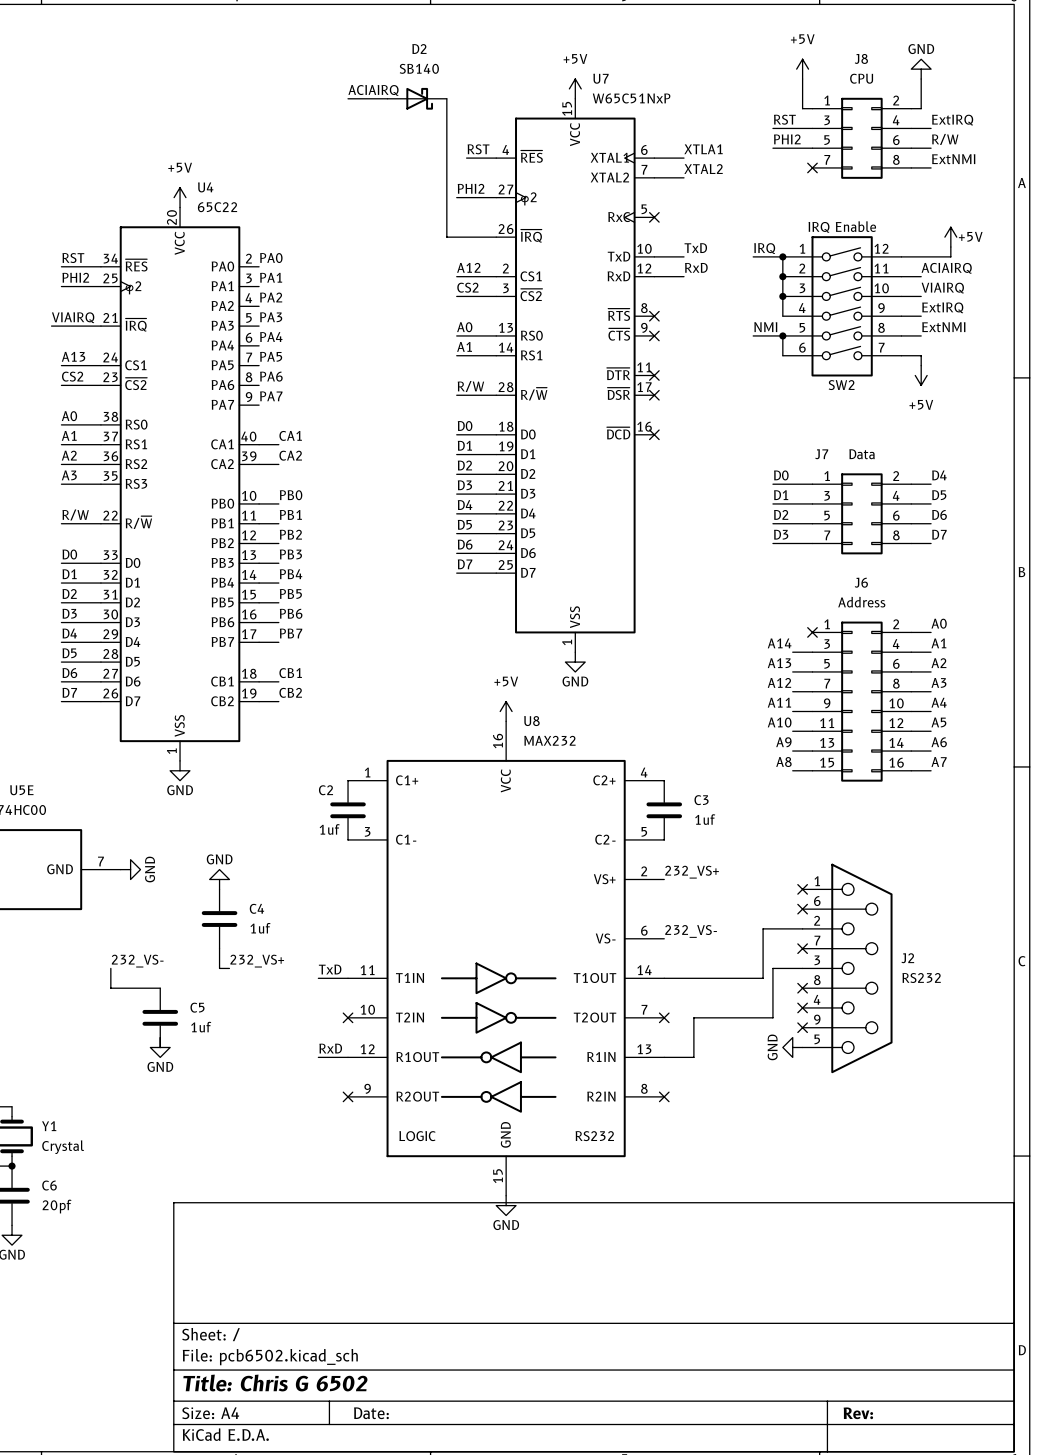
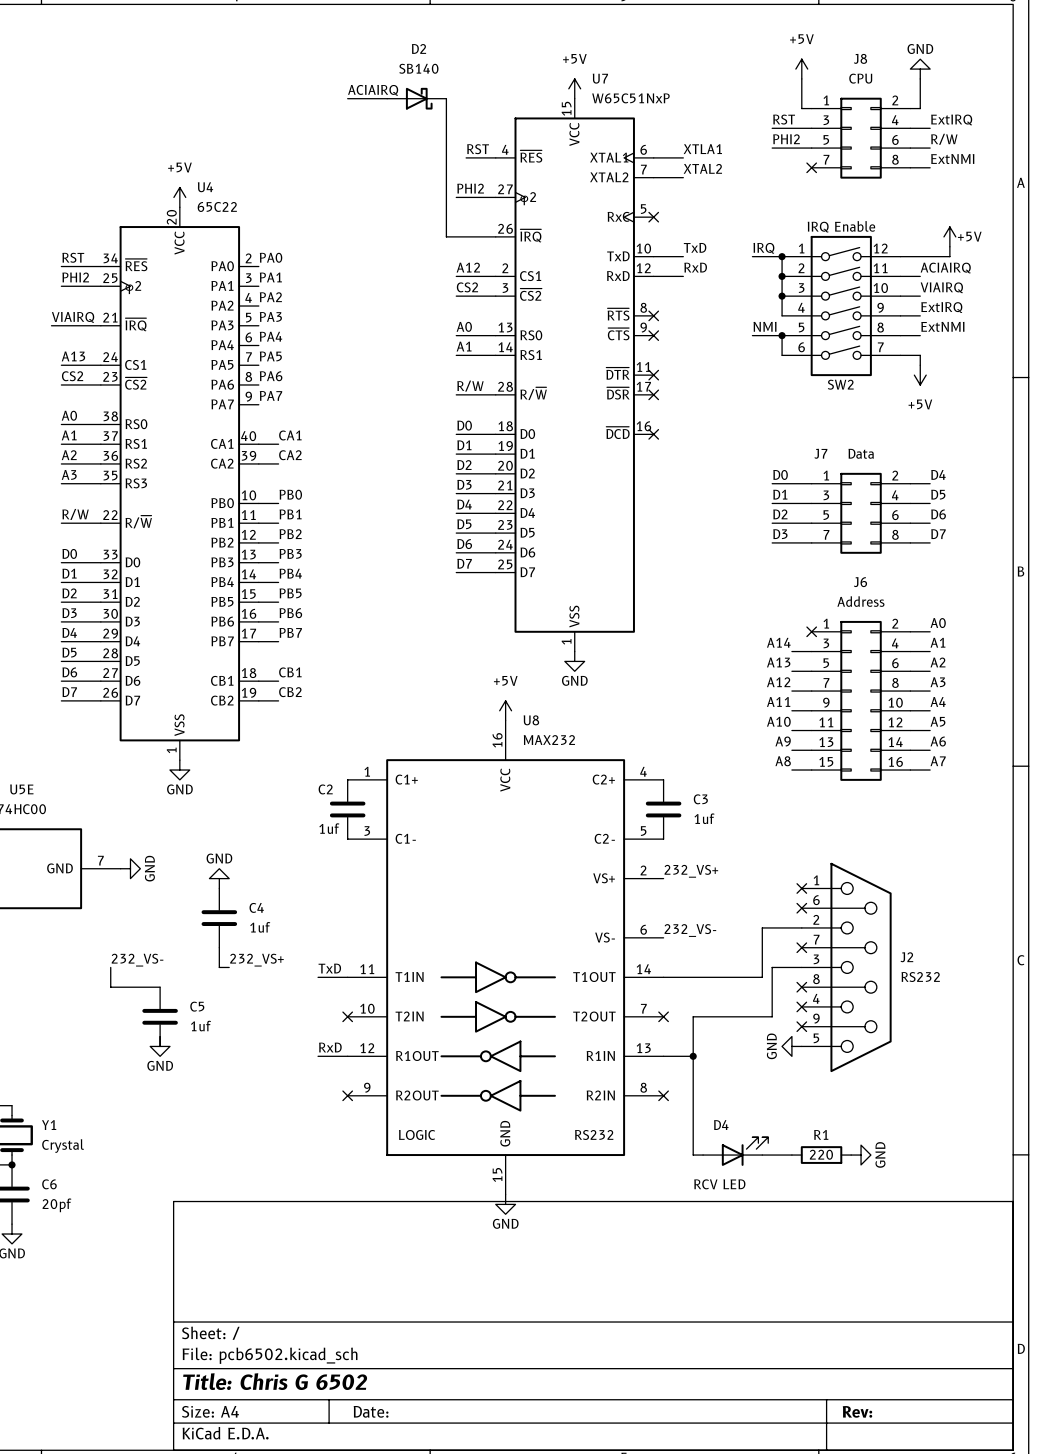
wire: none -> (693, 1056) (693, 1155) (703, 1155)
junction: none -> (693, 1056)
D4: none -> RCV LED (735, 1151)
wire: none -> (762, 1155) (791, 1155)
R1: none -> 220 (821, 1155)
power symbol: none -> GND (861, 1155)

